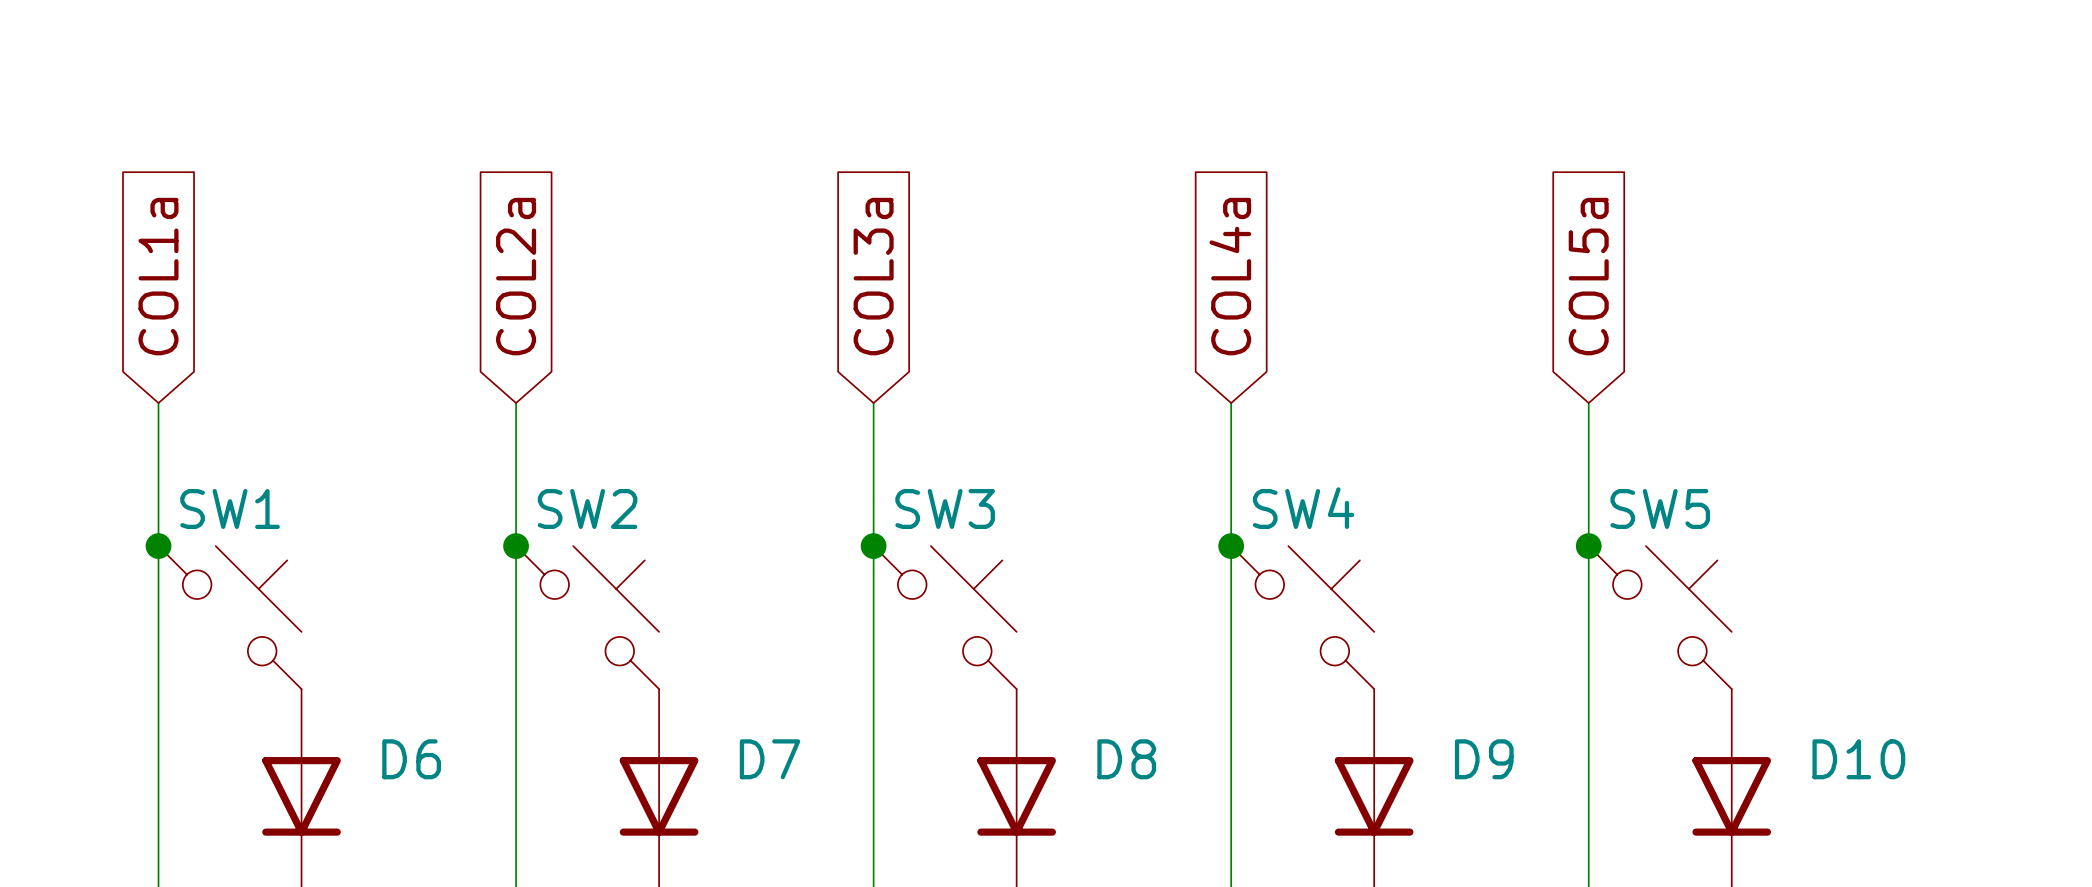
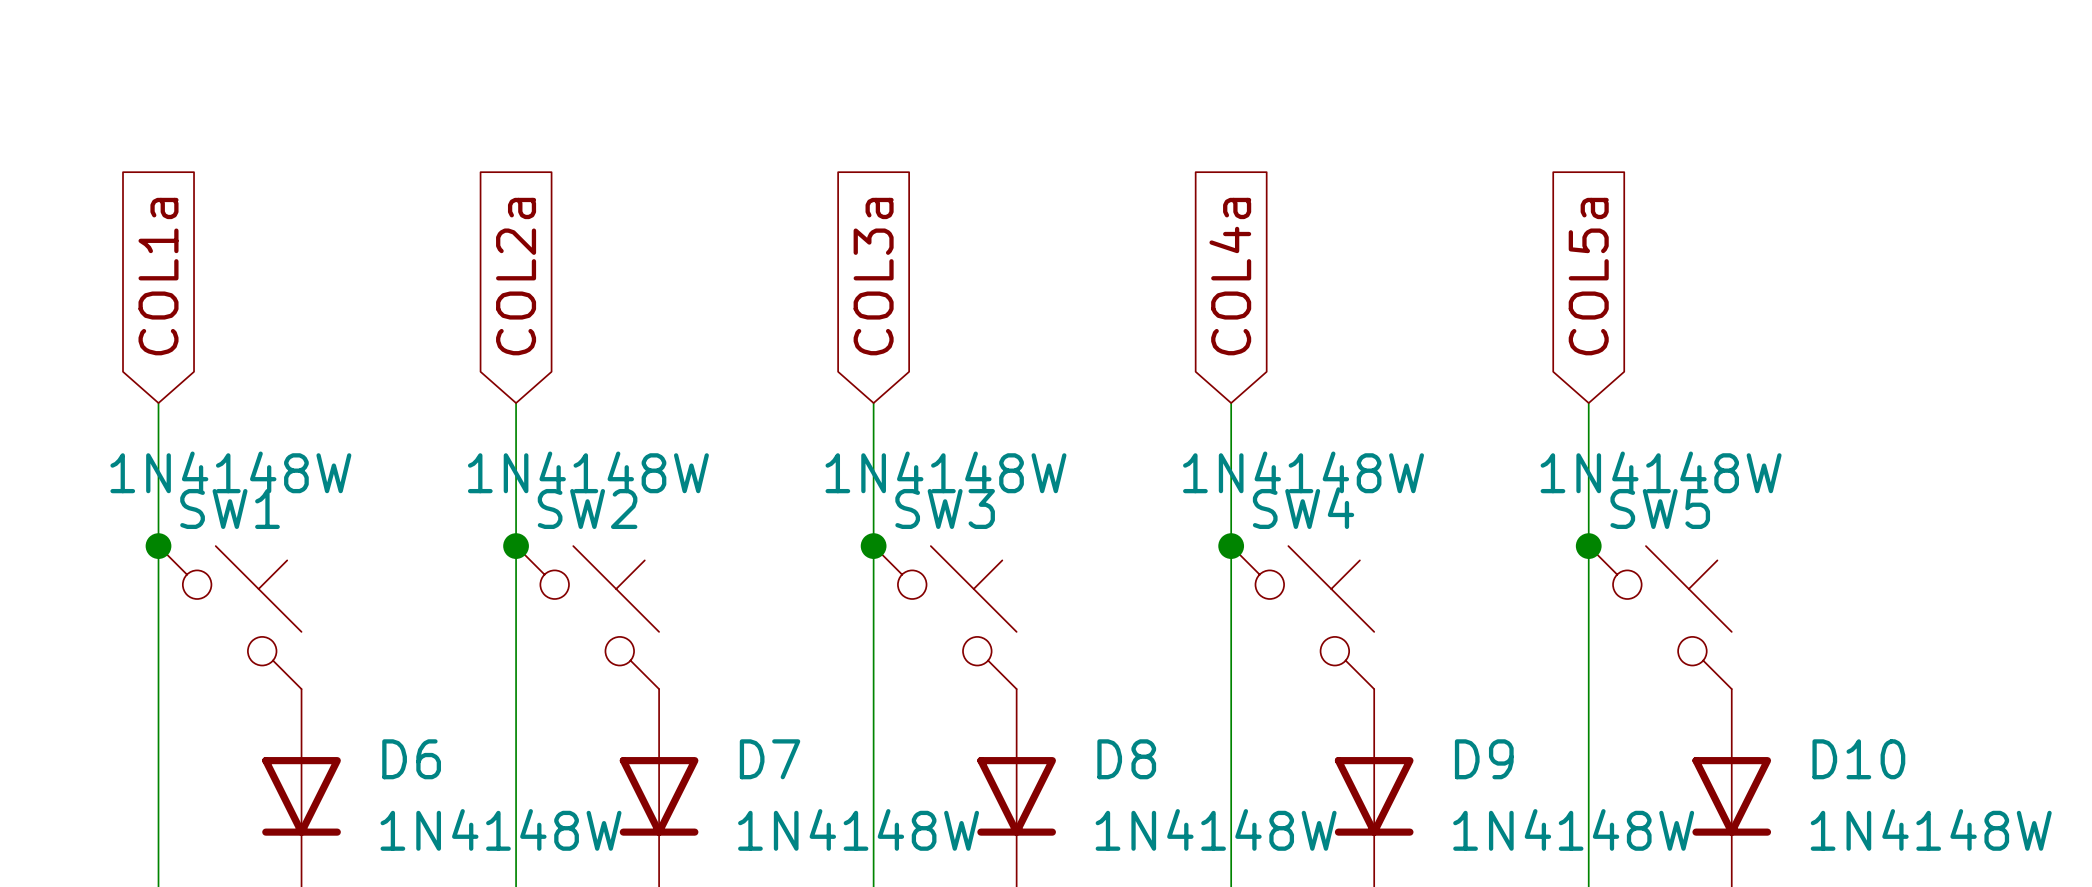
SW1 value: none -> 1N4148W (230, 472)
SW2 value: none -> 1N4148W (588, 472)
SW3 value: none -> 1N4148W (945, 472)
SW4 value: none -> 1N4148W (1303, 472)
SW5 value: none -> 1N4148W (1661, 472)
D6 value: none -> 1N4148W (501, 829)
D7 value: none -> 1N4148W (858, 829)
D8 value: none -> 1N4148W (1216, 829)
D9 value: none -> 1N4148W (1573, 829)
D10 value: none -> 1N4148W (1931, 829)

